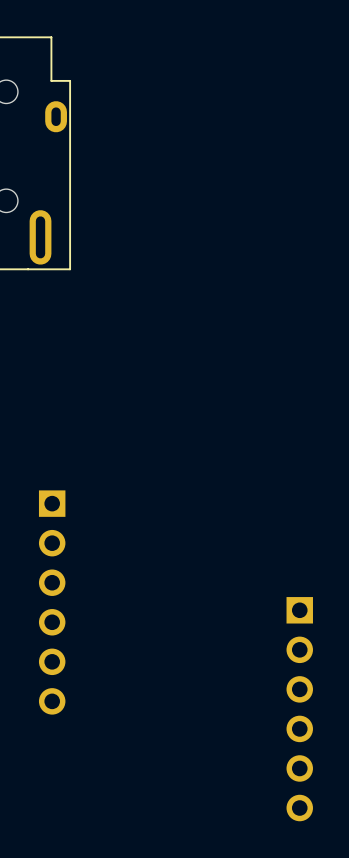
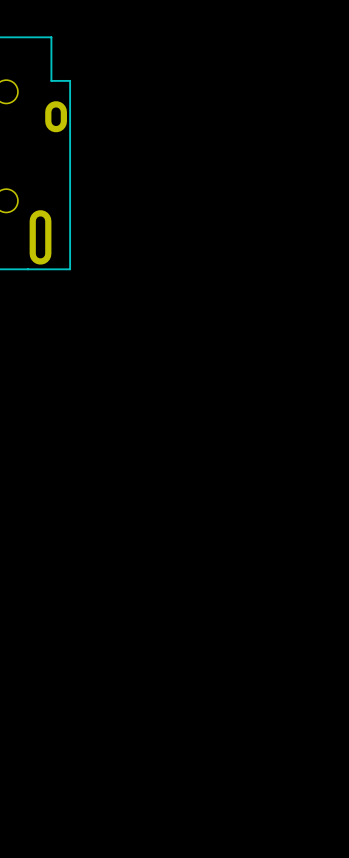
part: (52, 602) -> none
part: (299, 709) -> none

